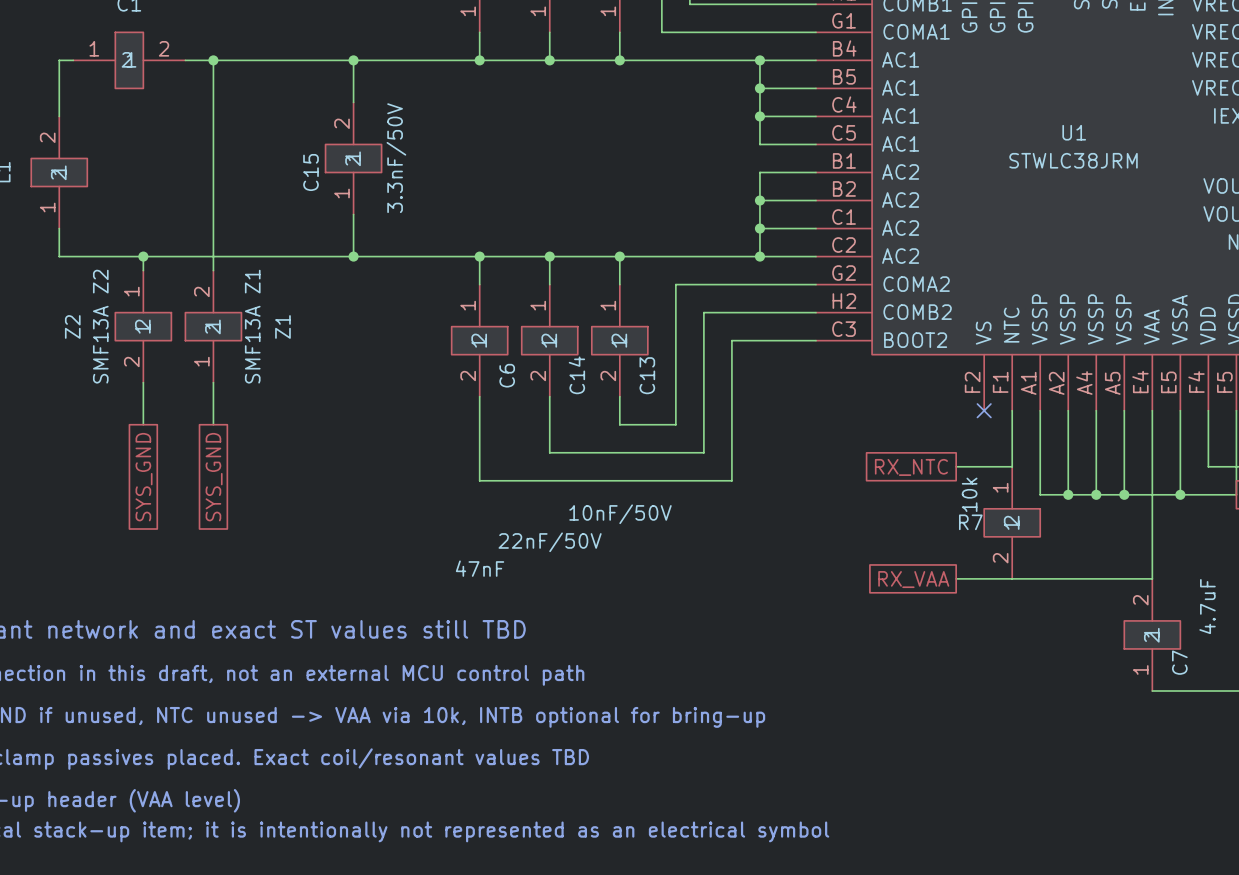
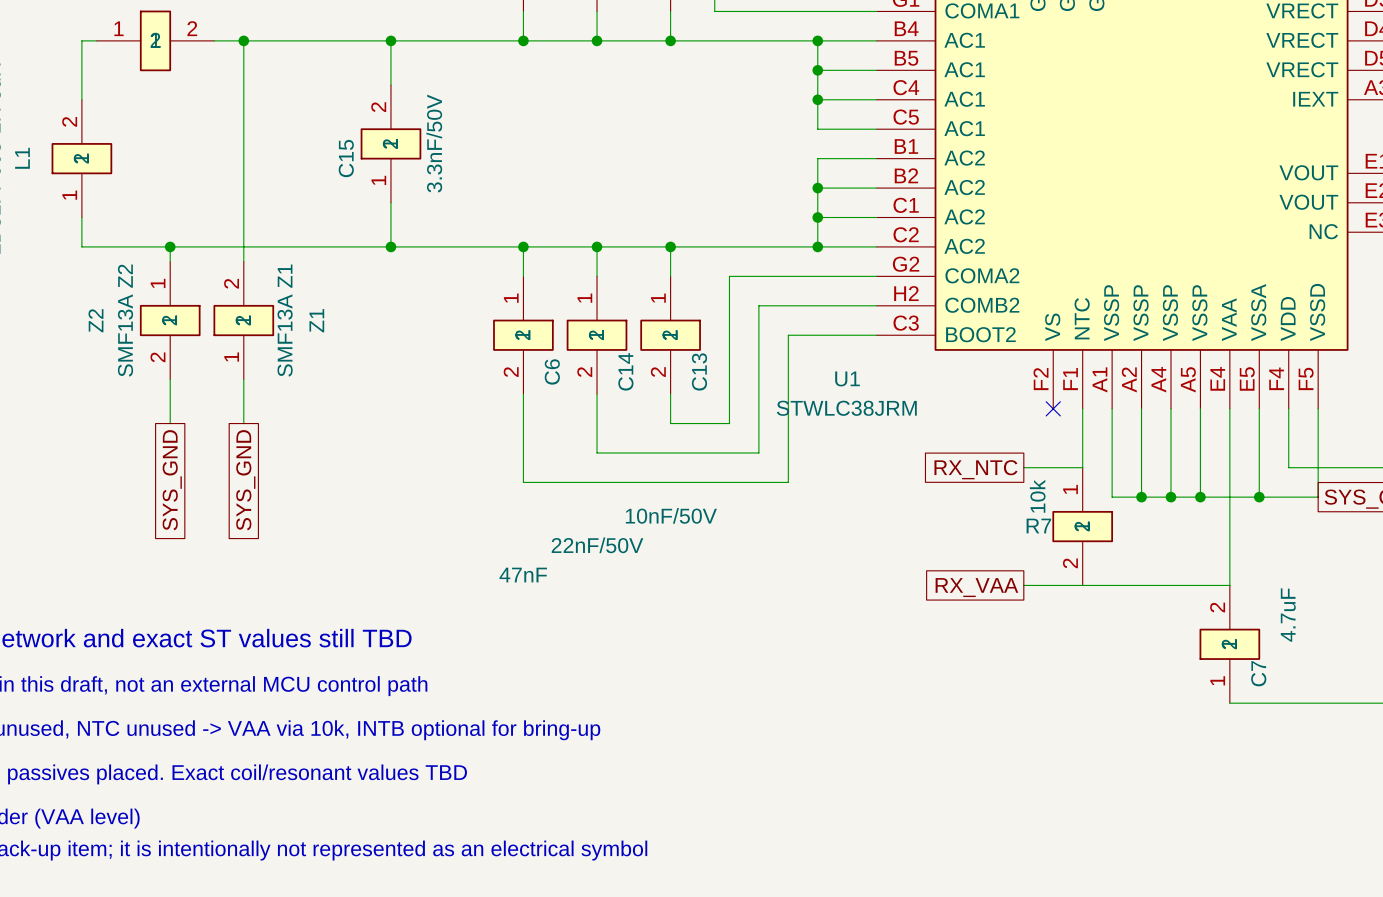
U1 name position: U1 (1074, 132) -> U1 (847, 378)
U1 value position: STWLC38JRM (1073, 160) -> STWLC38JRM (846, 408)

